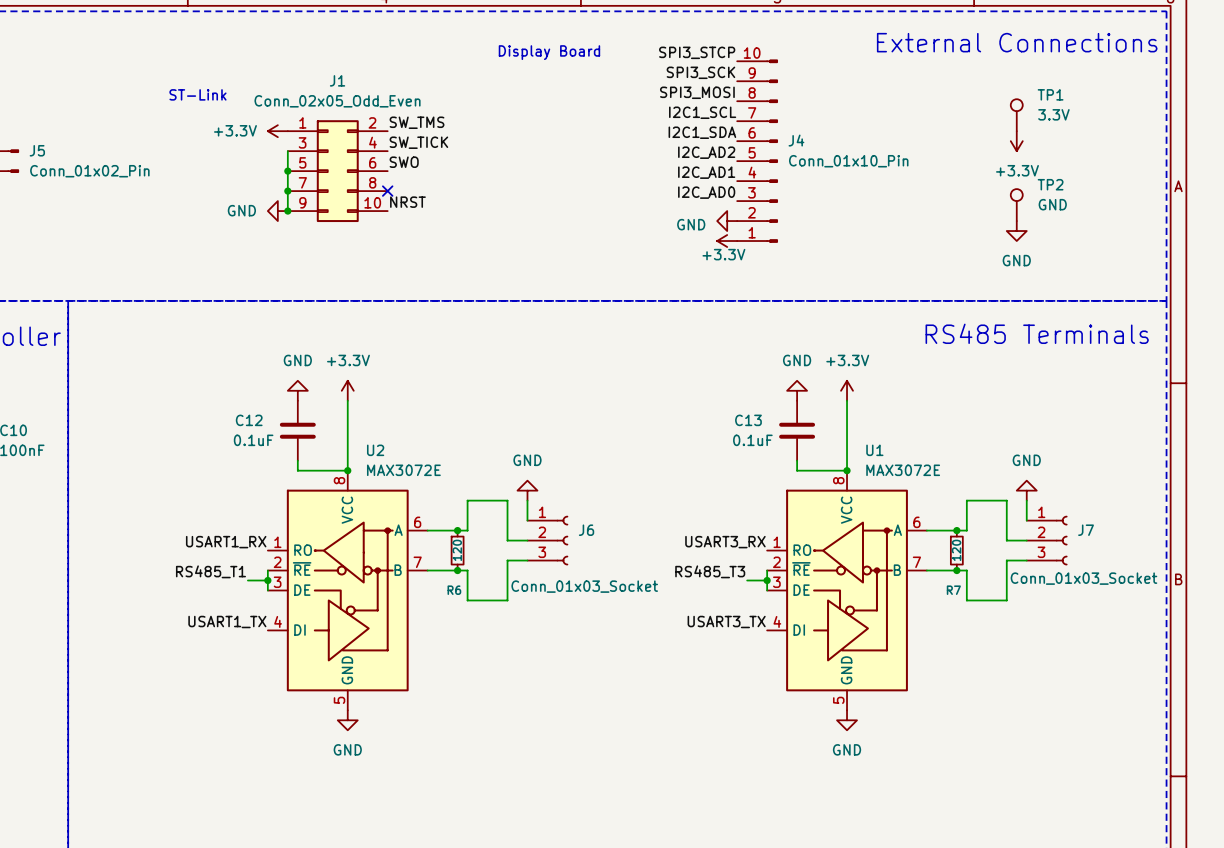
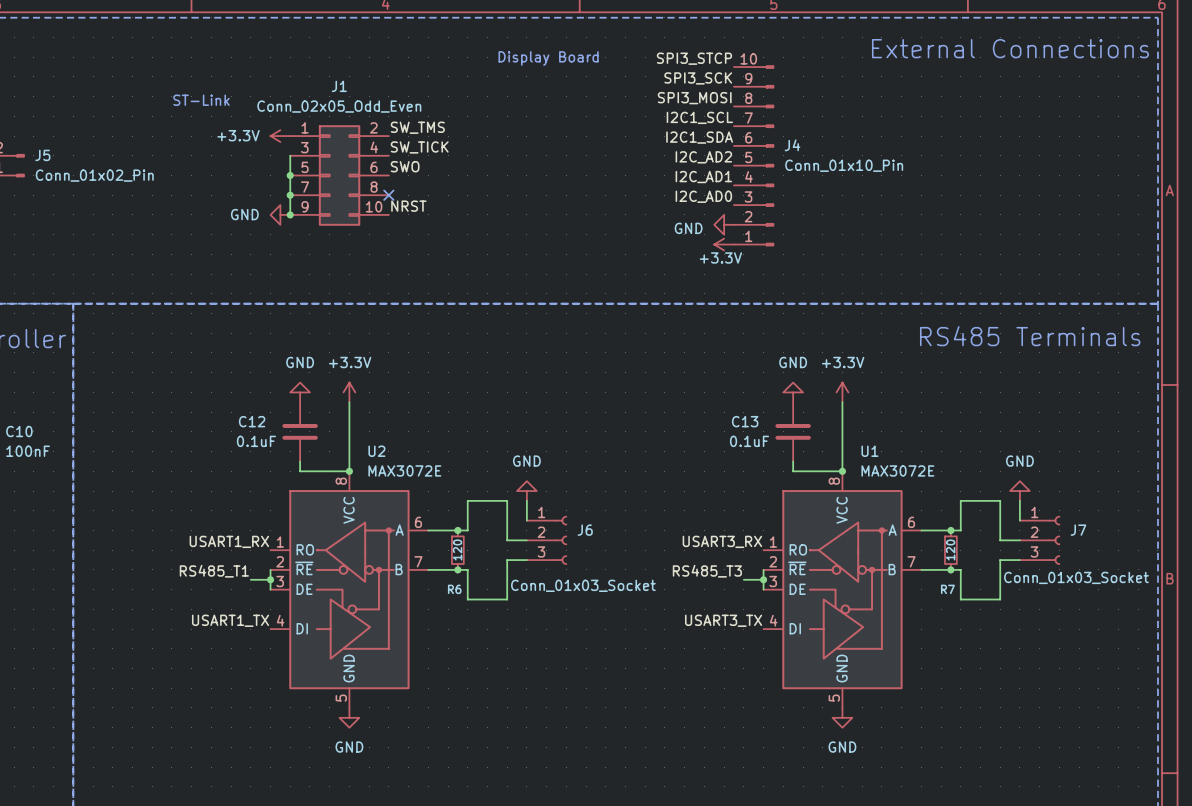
TP1: 3.3V (1016, 115) -> none
power symbol: +3.3V (1016, 141) -> none
TP2: GND (1016, 205) -> none
power symbol: GND (1016, 231) -> none

